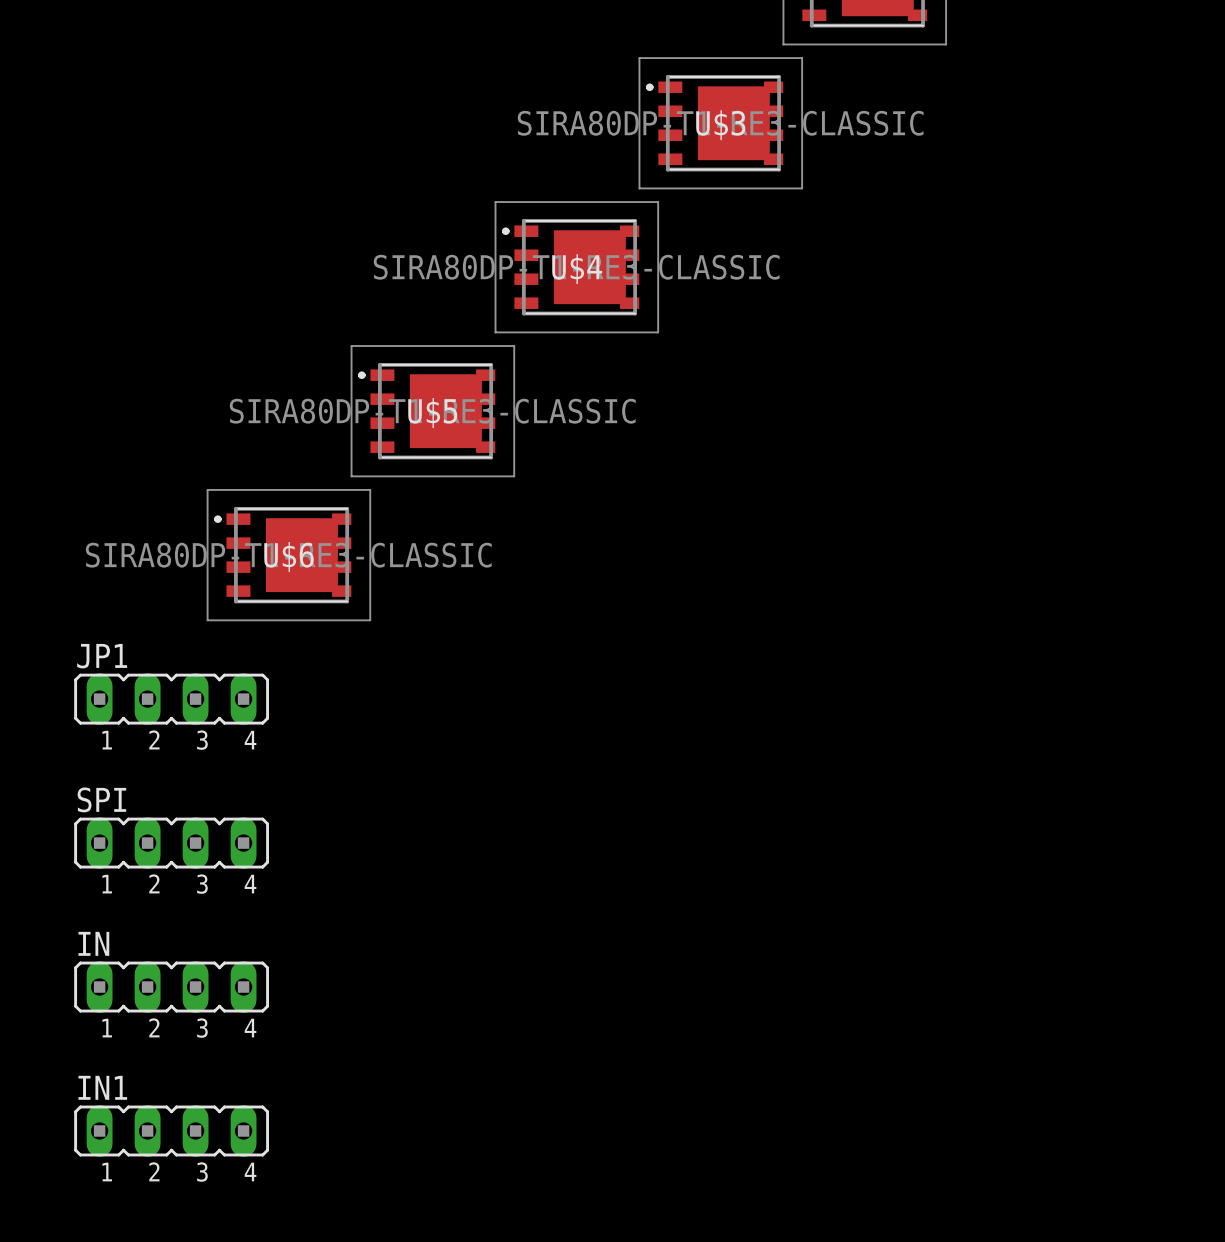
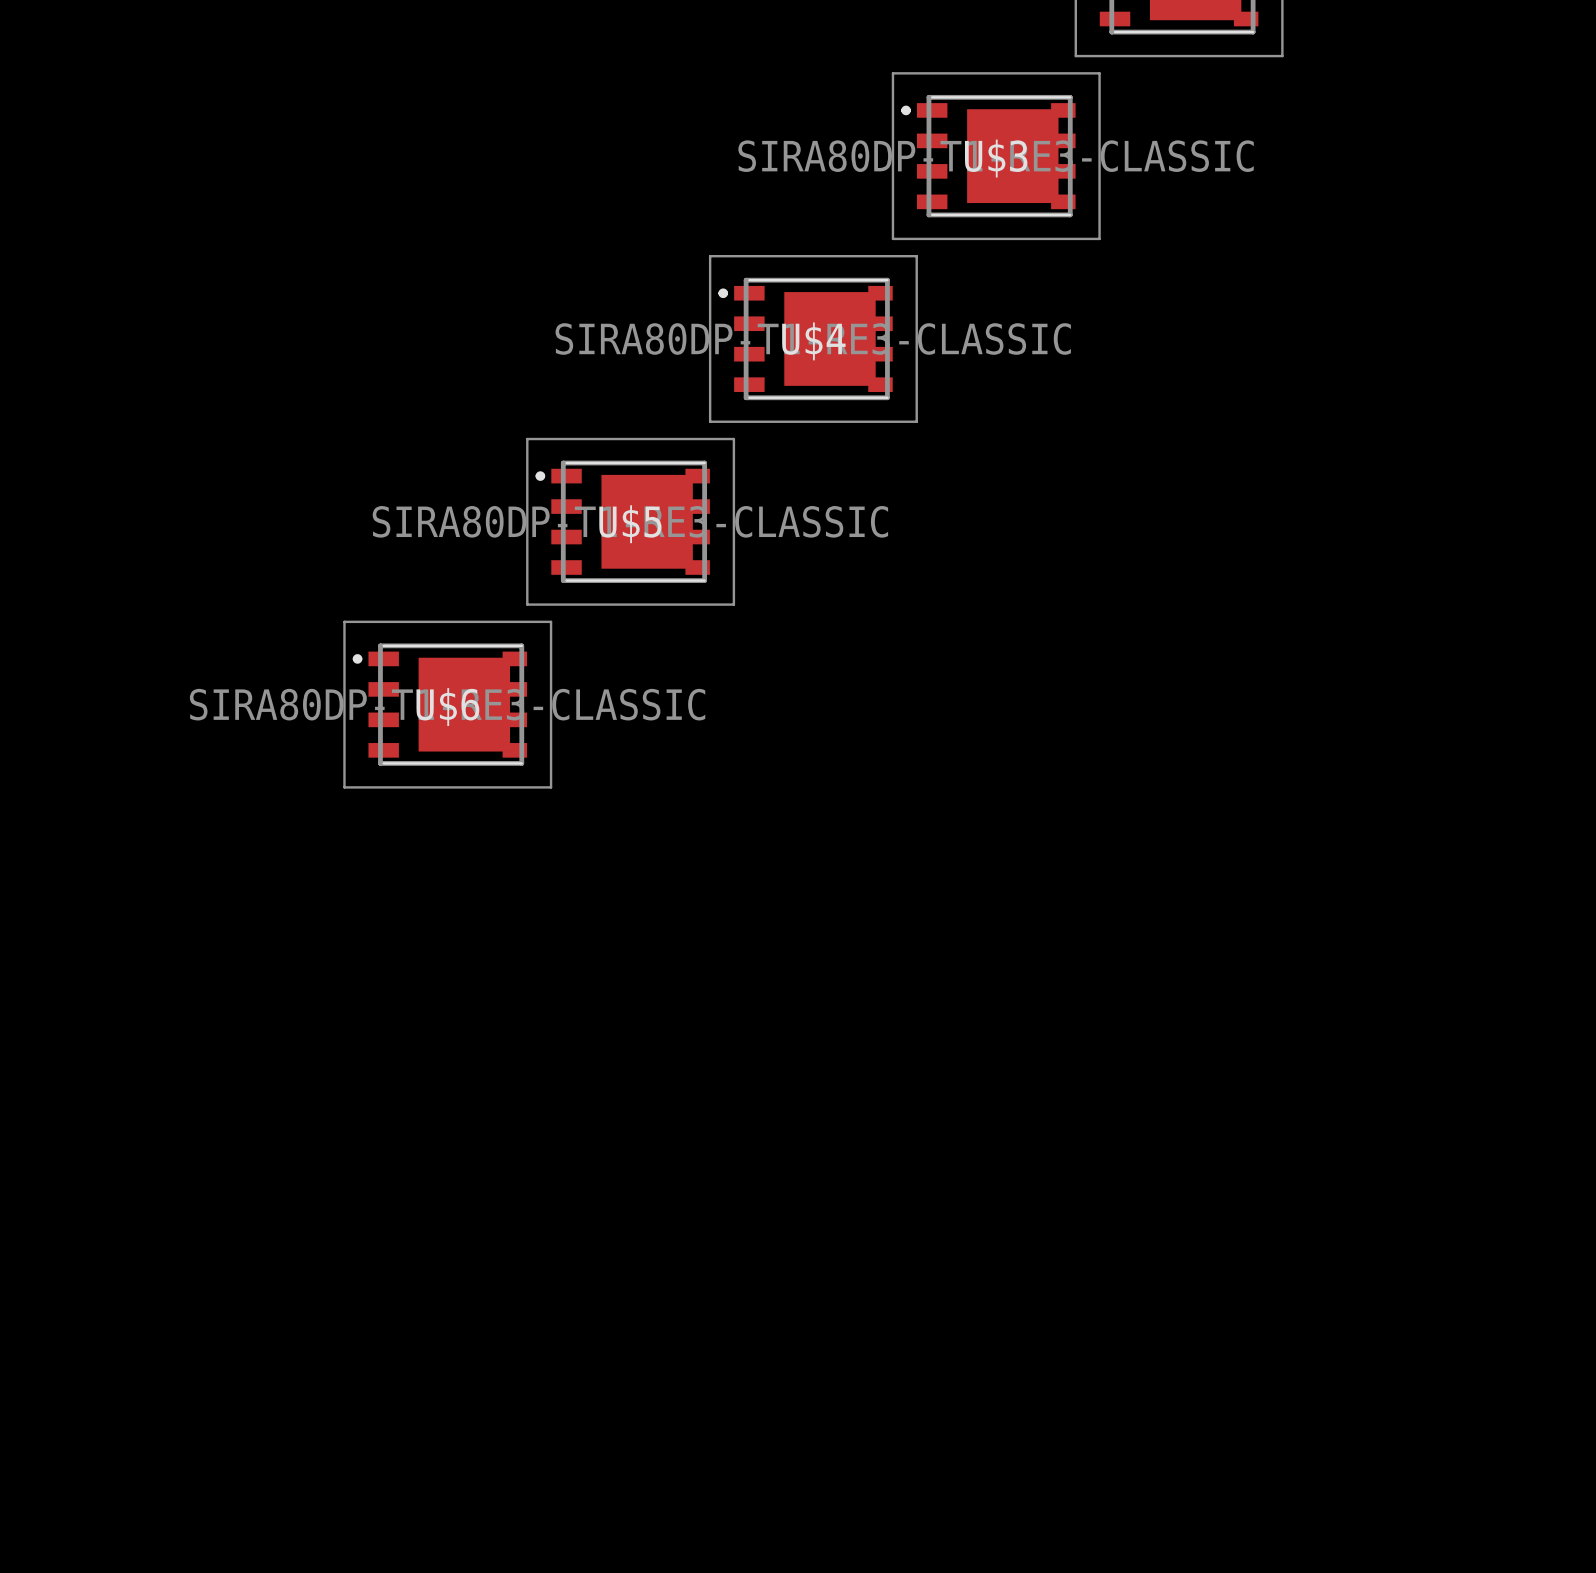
JP1: (171, 699) -> none
SPI: (171, 843) -> none
IN: (171, 987) -> none
IN1: (171, 1130) -> none

